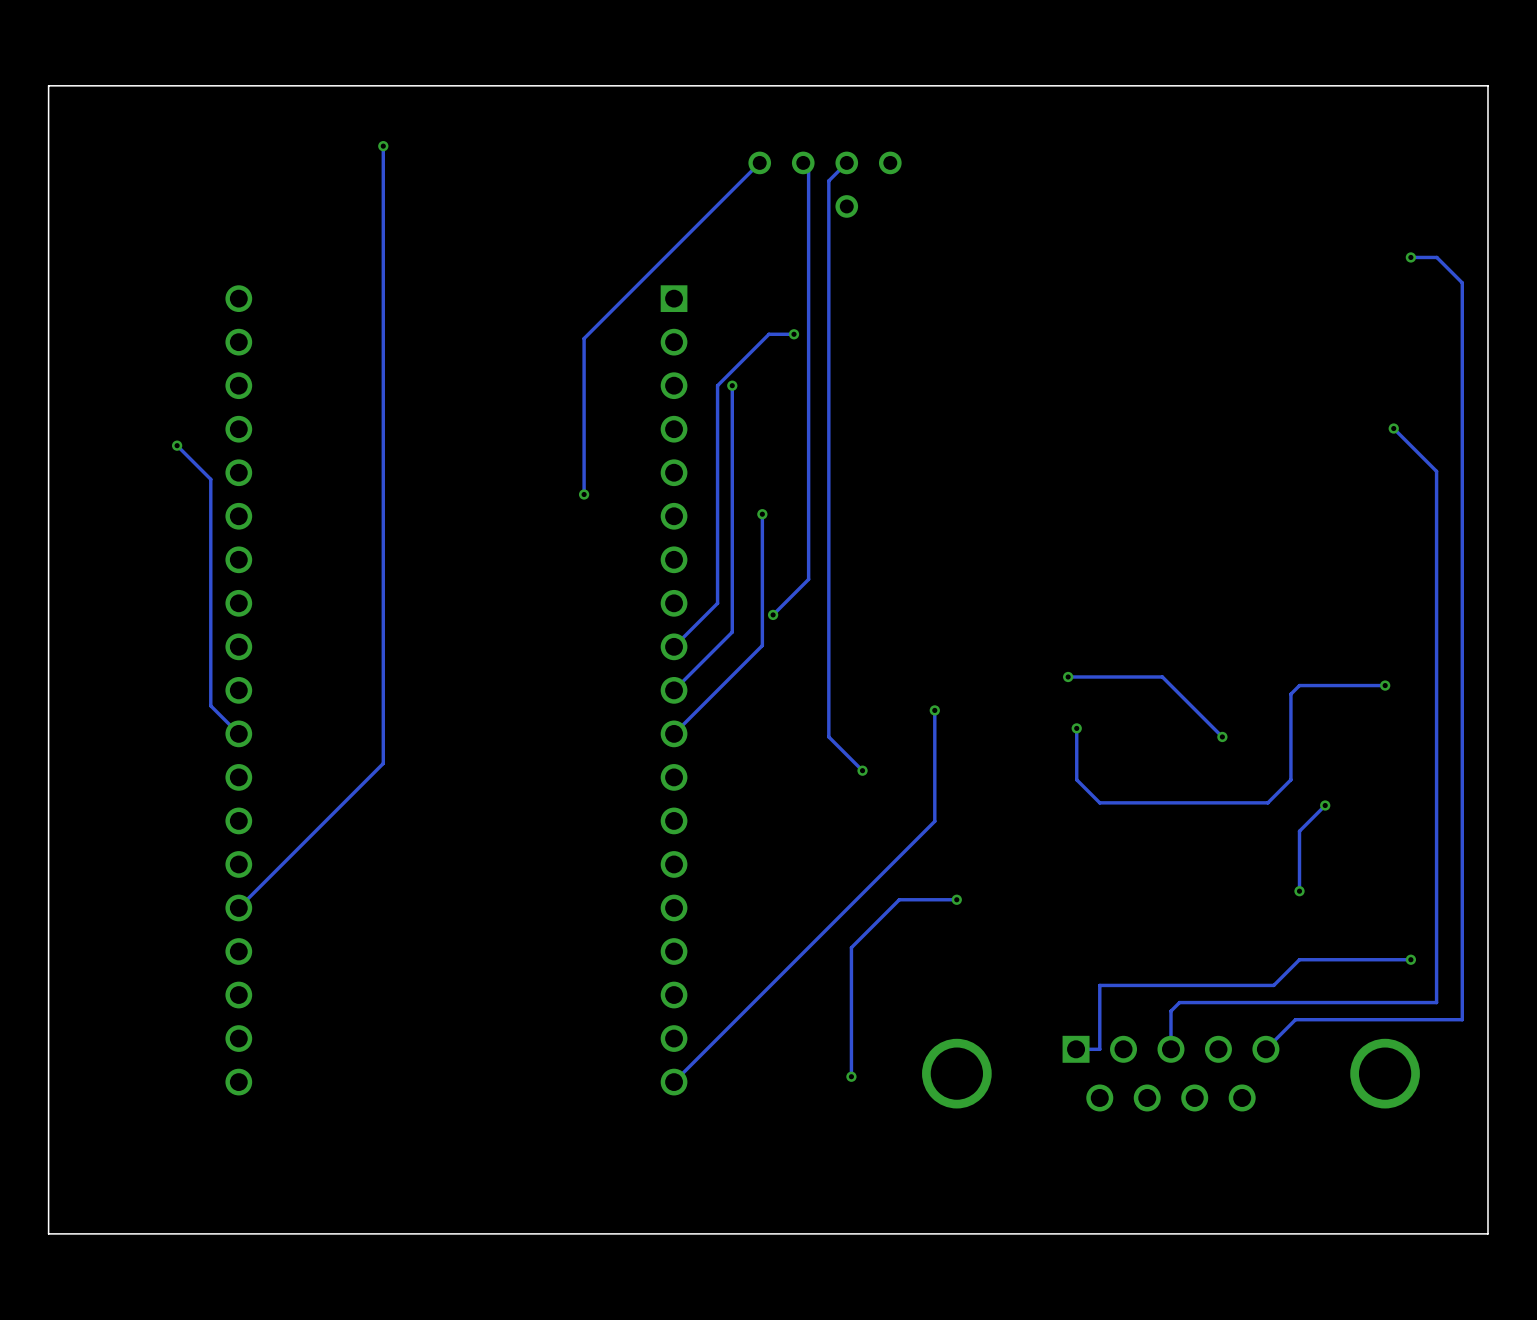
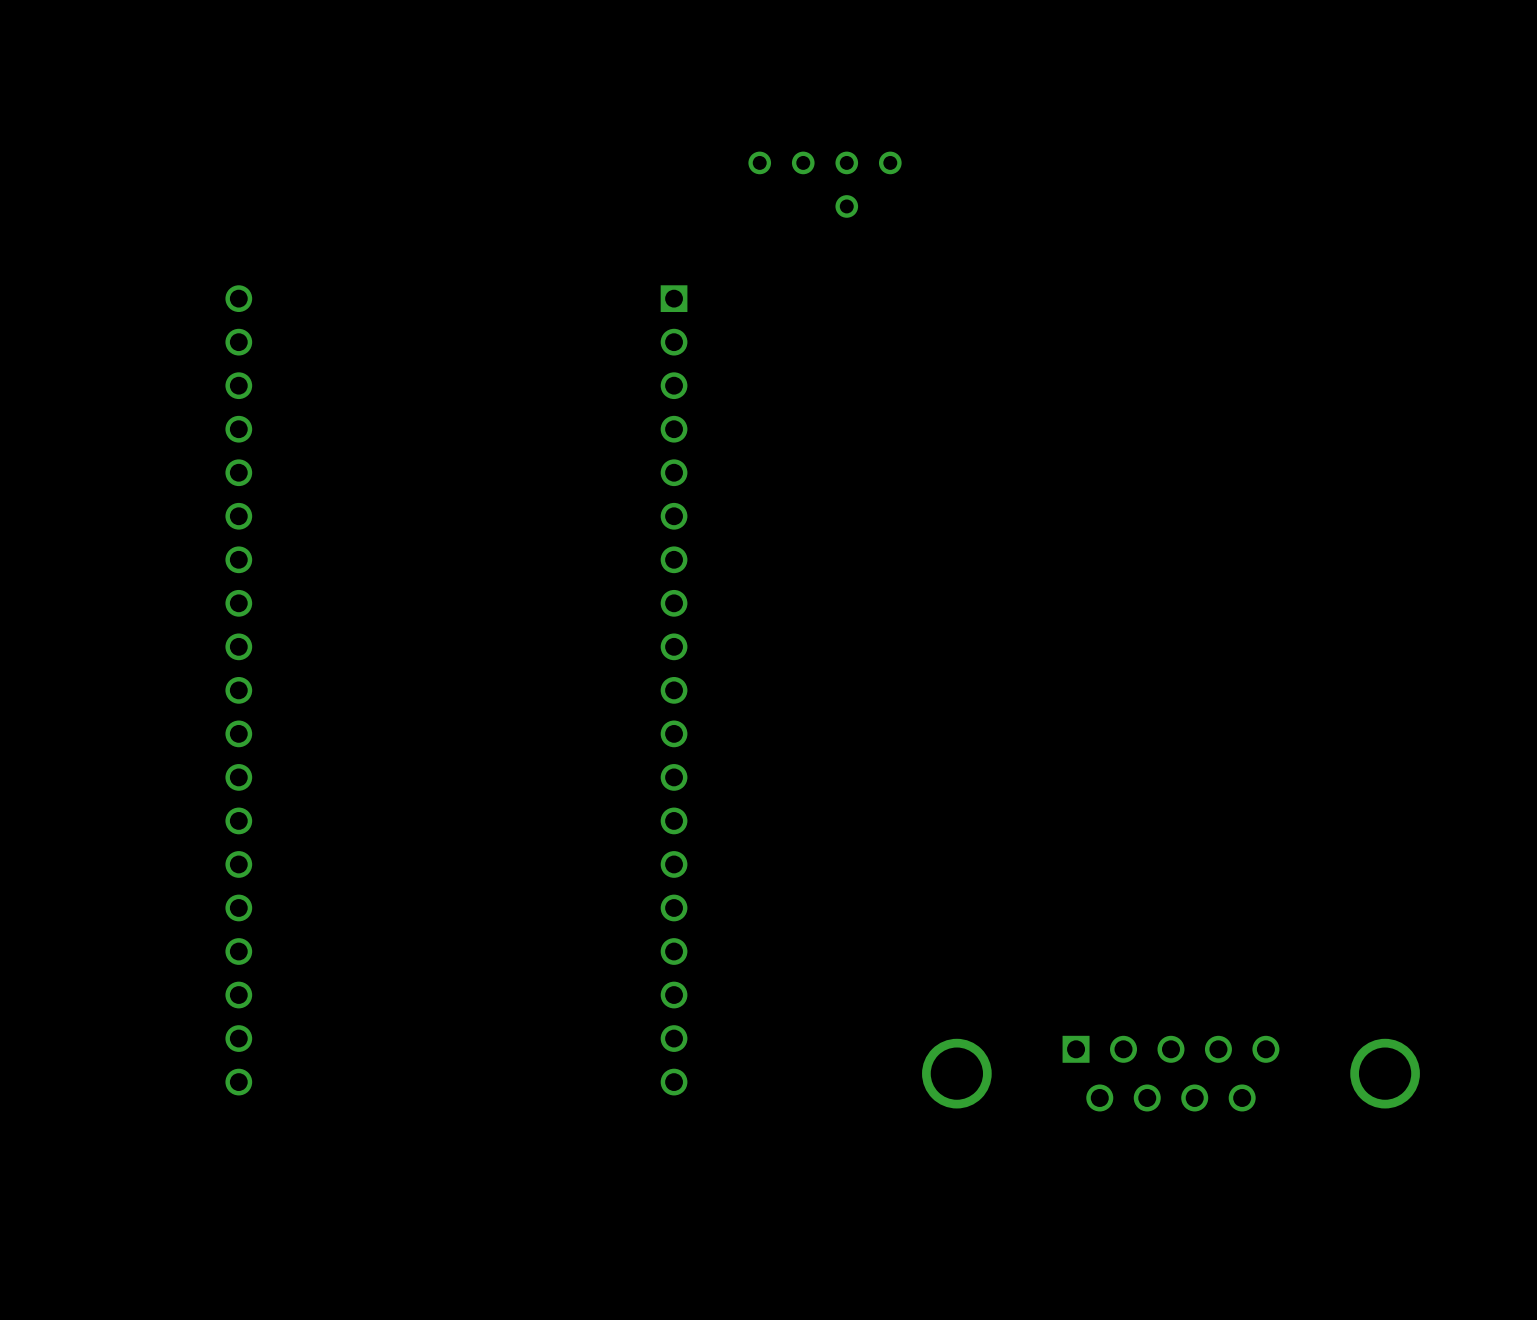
board edge: (1487, 85) (48, 85) (48, 1233) (1487, 1233) (1487, 85) -> none
track: (383, 146) (383, 763) (238, 907) -> none
via: (383, 146) -> none
track: (759, 162) (584, 338) (584, 494) -> none
track: (803, 162) (808, 168) (808, 579) (773, 614) -> none
track: (846, 162) (828, 180) (828, 736) (862, 770) -> none
track: (1410, 257) (1436, 257) (1462, 282) (1462, 1019) (1295, 1019) (1265, 1049) -> none
via: (1410, 257) -> none
track: (794, 334) (768, 334) (717, 385) (717, 603) (674, 646) -> none
via: (794, 334) -> none
track: (732, 385) (732, 632) (674, 690) -> none
via: (732, 385) -> none
track: (1393, 428) (1436, 471) (1436, 1002) (1179, 1002) (1170, 1011) (1170, 1049) -> none
via: (1393, 428) -> none
track: (177, 445) (210, 479) (210, 705) (238, 733) -> none
via: (177, 445) -> none
via: (584, 494) -> none
track: (762, 514) (762, 645) (674, 733) -> none
via: (762, 514) -> none
via: (773, 614) -> none
track: (1068, 676) (1162, 676) (1222, 736) -> none
via: (1068, 676) -> none
track: (1385, 685) (1299, 685) (1290, 694) (1290, 779) (1267, 802) (1099, 802) (1076, 779) (1076, 728) -> none
via: (1385, 685) -> none
track: (934, 710) (934, 821) (674, 1082) -> none
via: (934, 710) -> none
via: (1076, 728) -> none
via: (1222, 736) -> none
via: (862, 770) -> none
track: (1325, 805) (1299, 831) (1299, 891) -> none
via: (1325, 805) -> none
via: (1299, 891) -> none
track: (956, 899) (899, 899) (851, 947) (851, 1076) -> none
via: (956, 899) -> none
track: (1410, 959) (1299, 959) (1273, 985) (1099, 985) (1099, 1049) (1076, 1049) -> none
via: (1410, 959) -> none
via: (851, 1076) -> none

